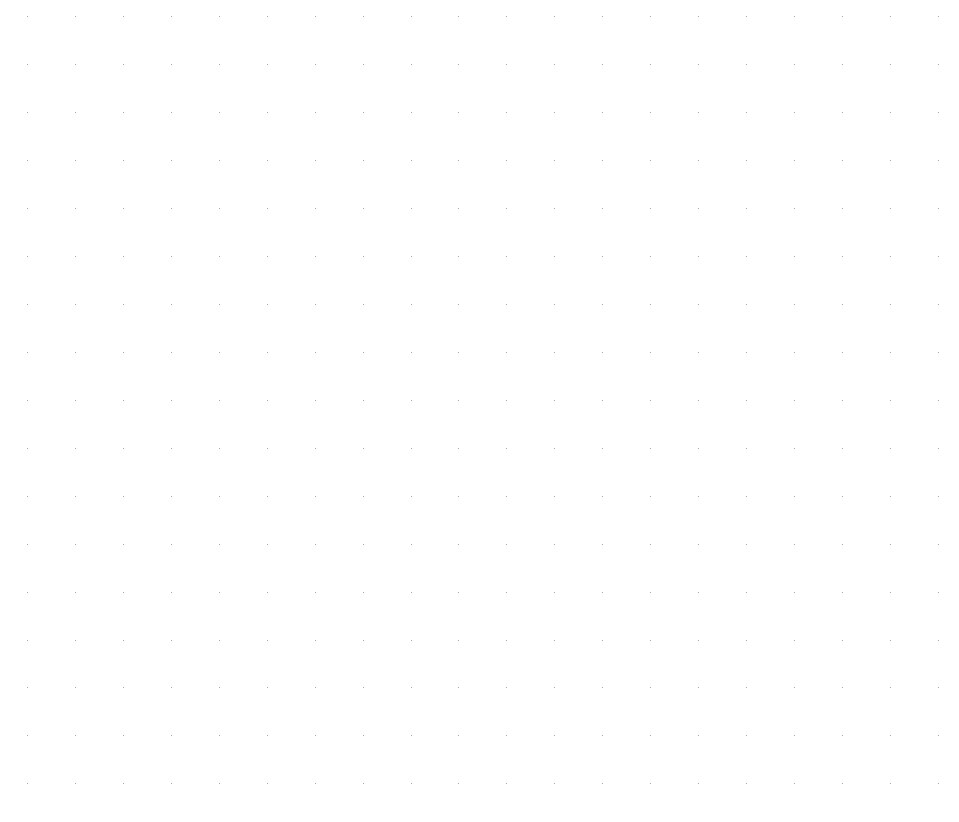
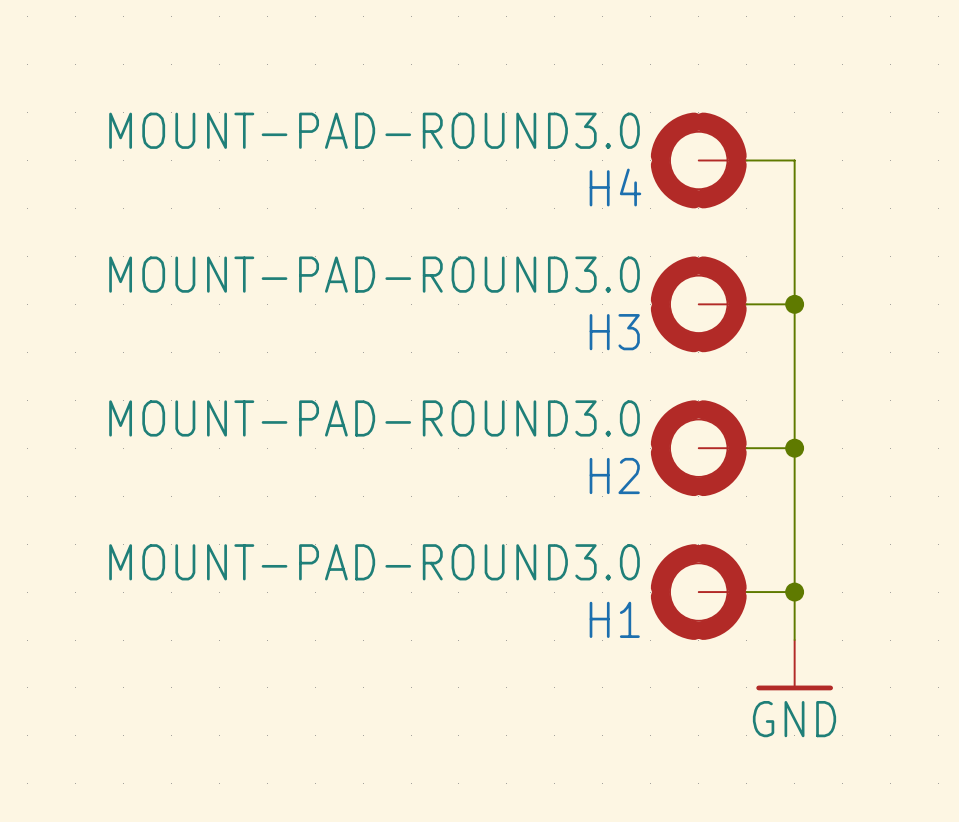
H4: none -> MOUNT-PAD-ROUND3.0 (698, 160)
wire: none -> (746, 160) (794, 160) (794, 640)
H3: none -> MOUNT-PAD-ROUND3.0 (698, 304)
wire: none -> (746, 304) (794, 304)
junction: none -> (794, 304)
H2: none -> MOUNT-PAD-ROUND3.0 (698, 448)
wire: none -> (746, 448) (794, 448)
junction: none -> (794, 448)
H1: none -> MOUNT-PAD-ROUND3.0 (698, 592)
wire: none -> (746, 592) (794, 592)
junction: none -> (794, 592)
power symbol: none -> GND (794, 665)

